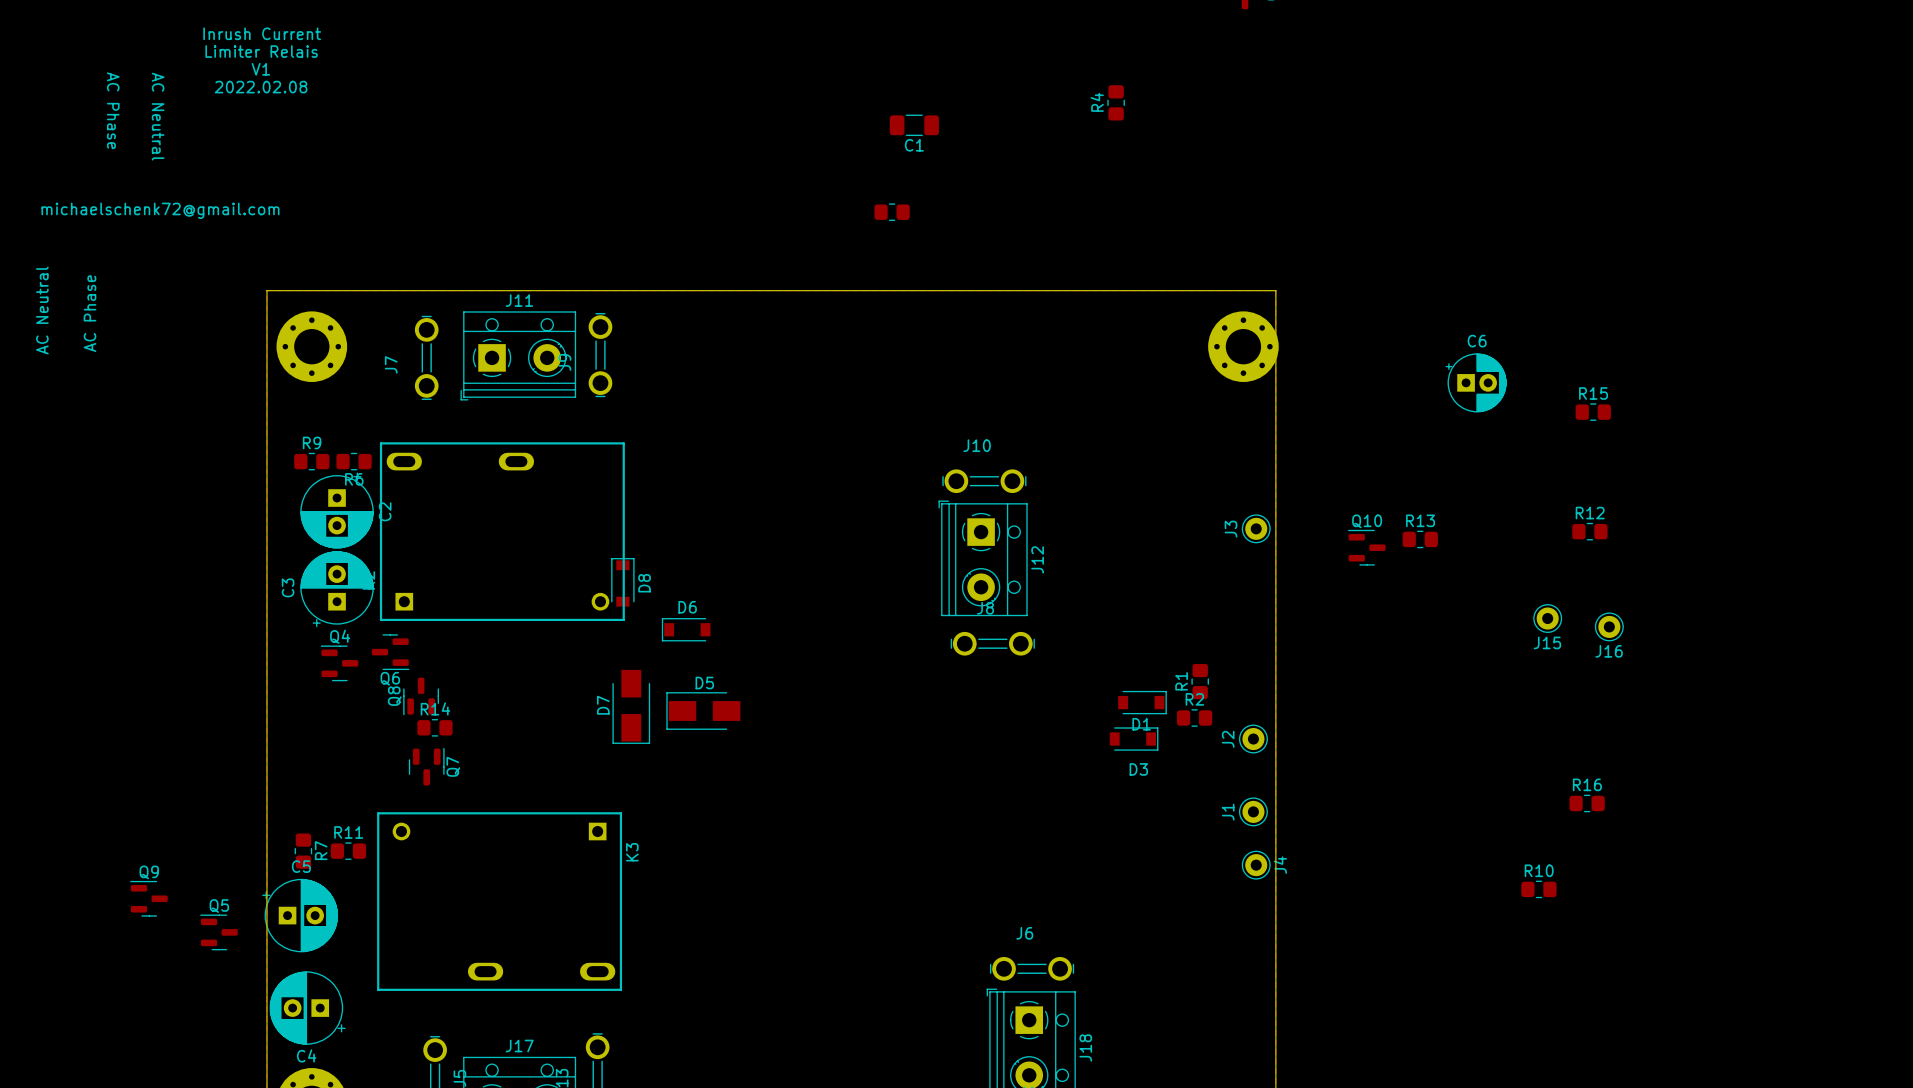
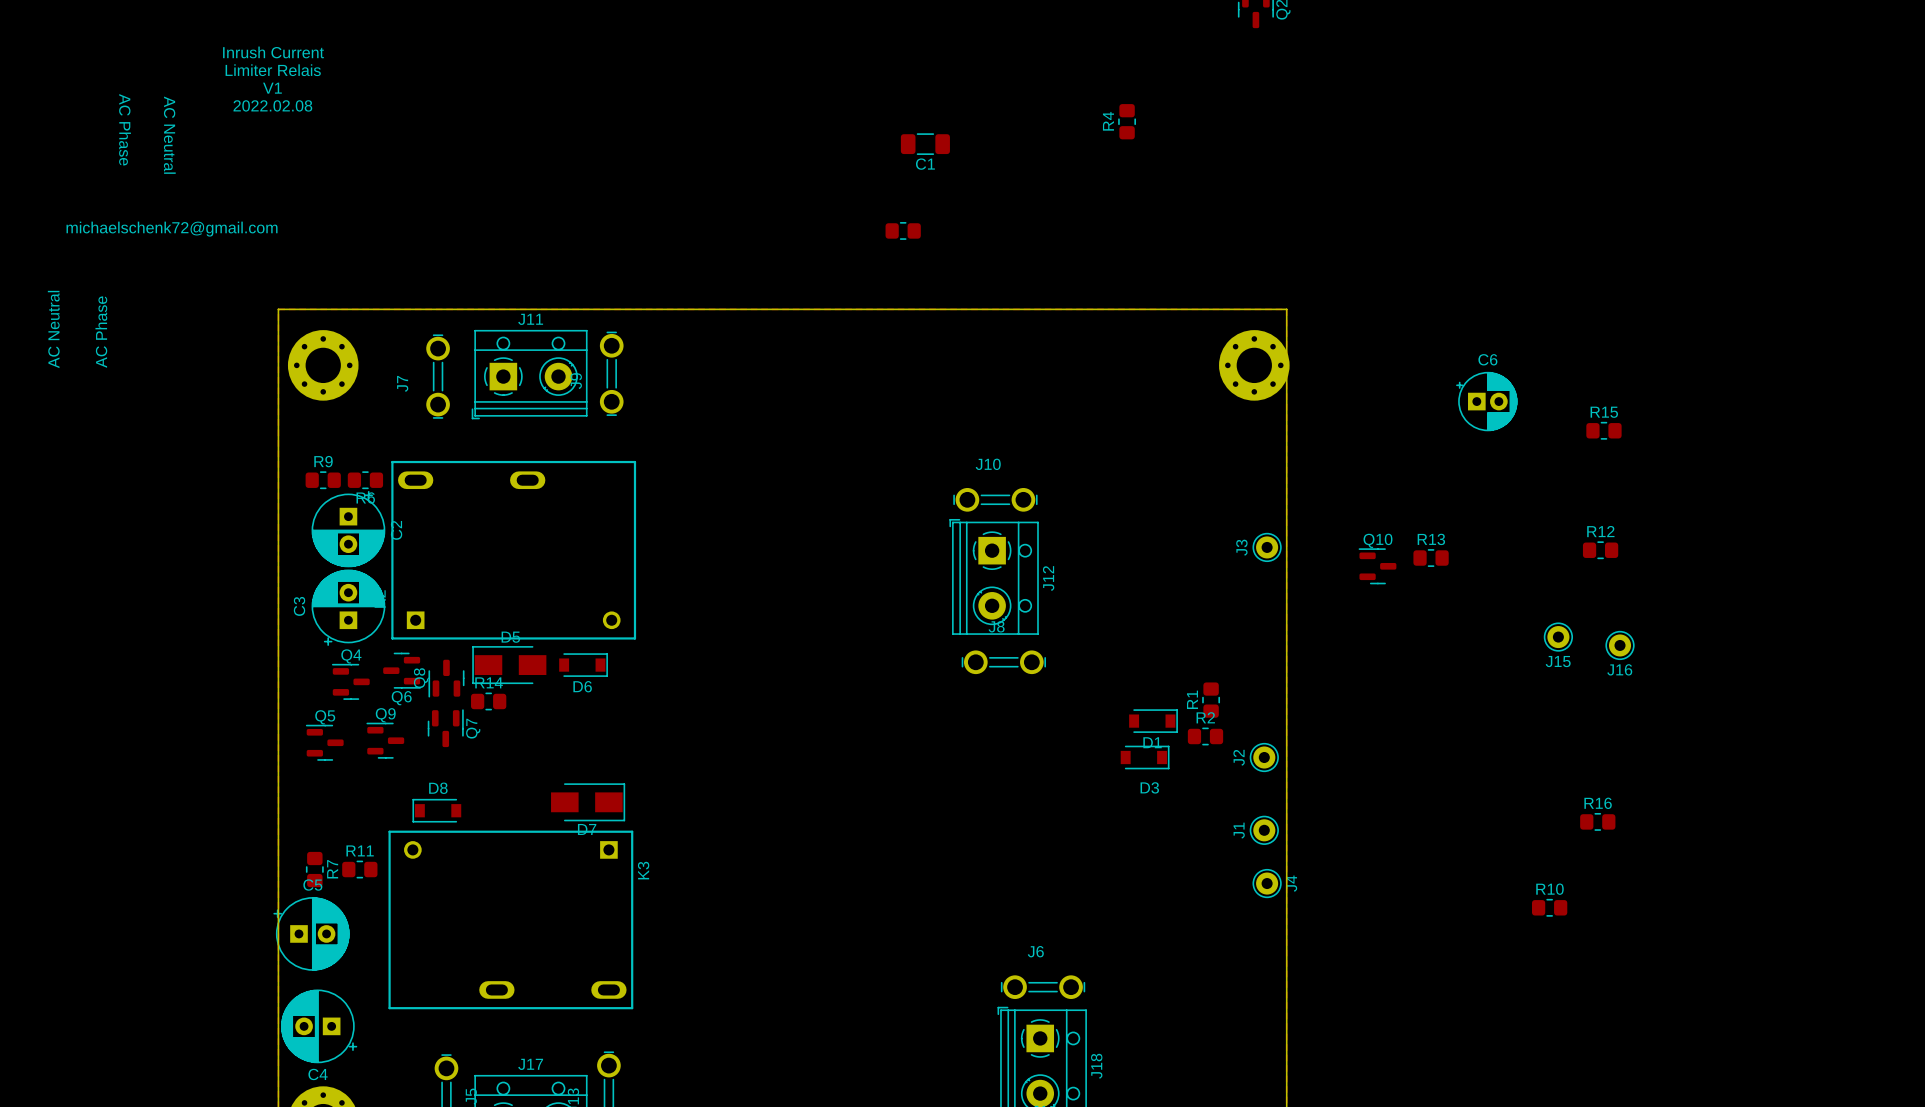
D8 rotation: 0° (622, 582) -> 90° counterclockwise (436, 810)
D8 position: (622, 582) -> (436, 810)
D6 rotation: 0° (686, 629) -> 180° (583, 665)
D6 position: (686, 629) -> (583, 665)
Q8 position: (421, 696) -> (446, 678)
D7 rotation: 0° (631, 706) -> 90° counterclockwise (588, 802)
D7 position: (631, 706) -> (588, 802)
D5 position: (703, 711) -> (509, 665)
R14 position: (434, 727) -> (488, 701)
Q7 position: (426, 766) -> (445, 728)
Q9 position: (148, 898) -> (385, 740)
Q5 position: (219, 932) -> (324, 742)

